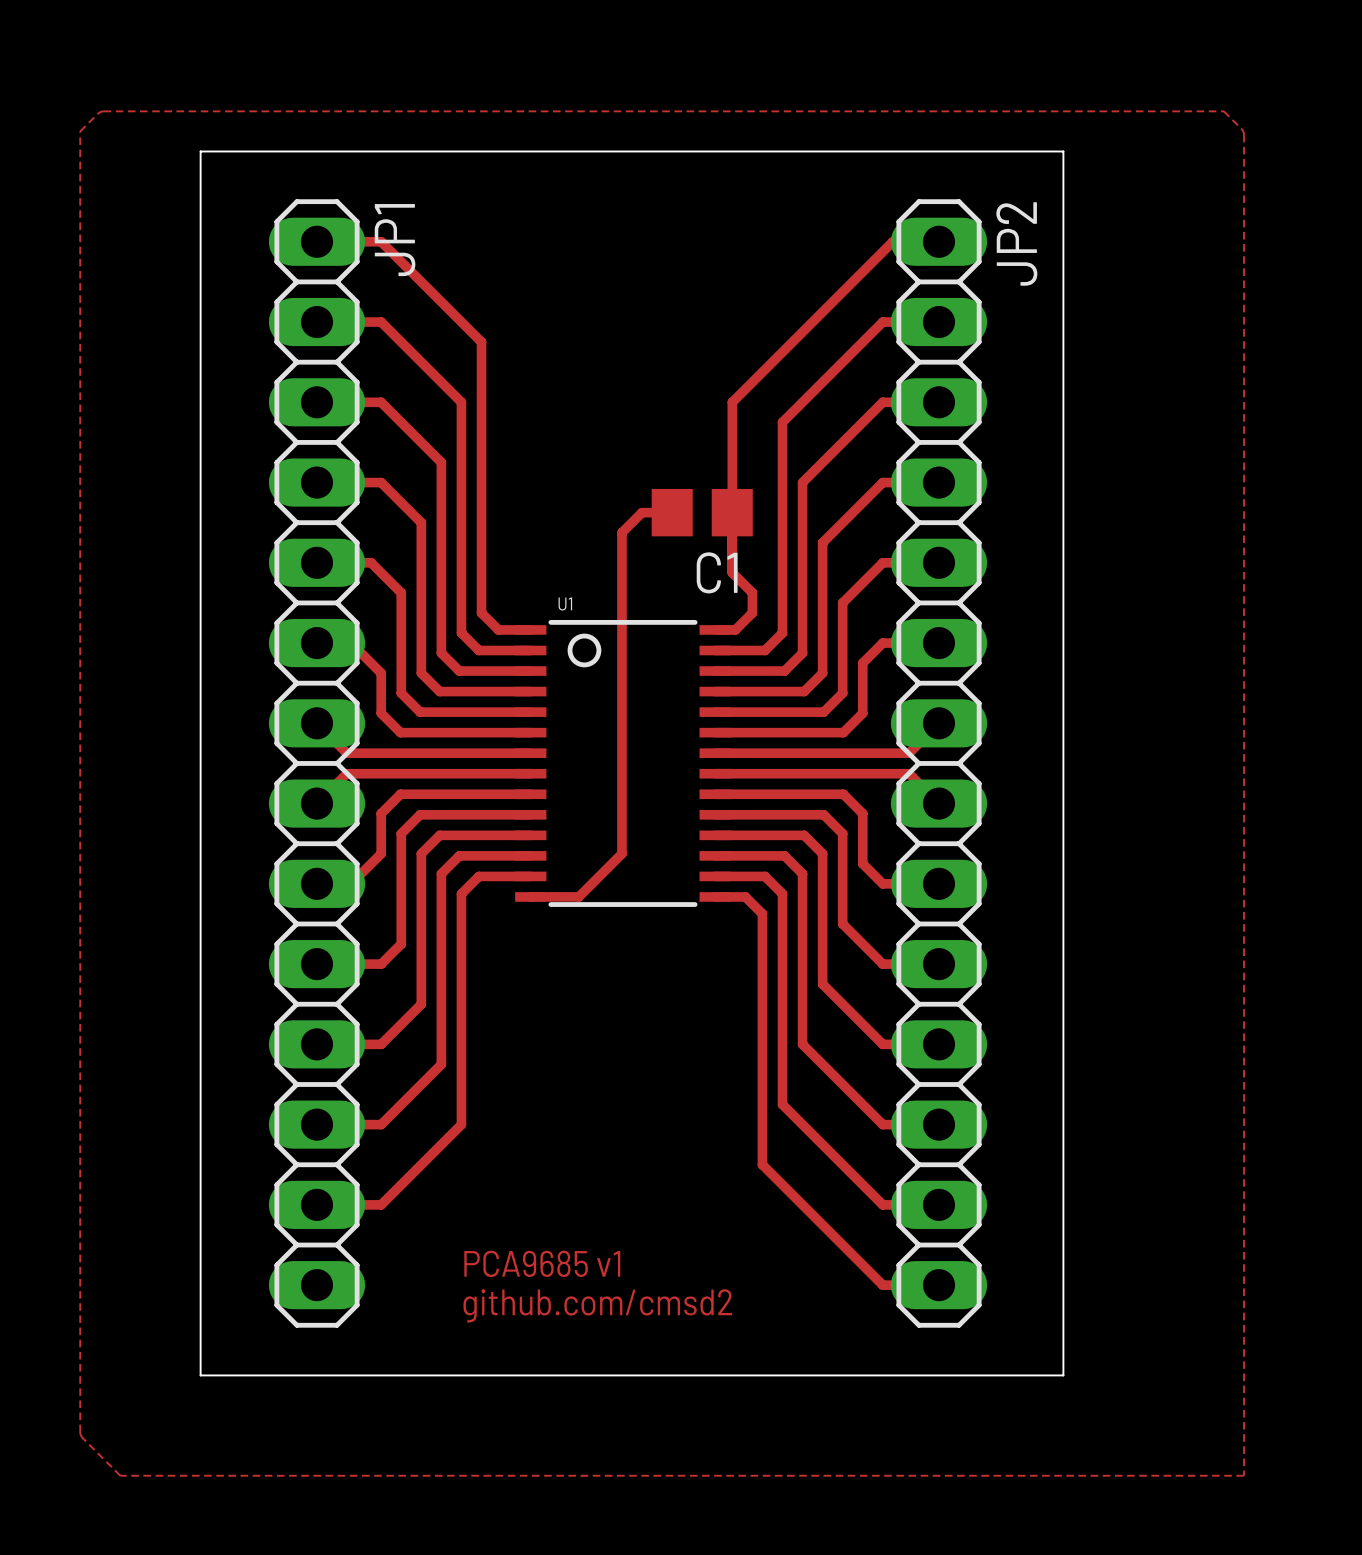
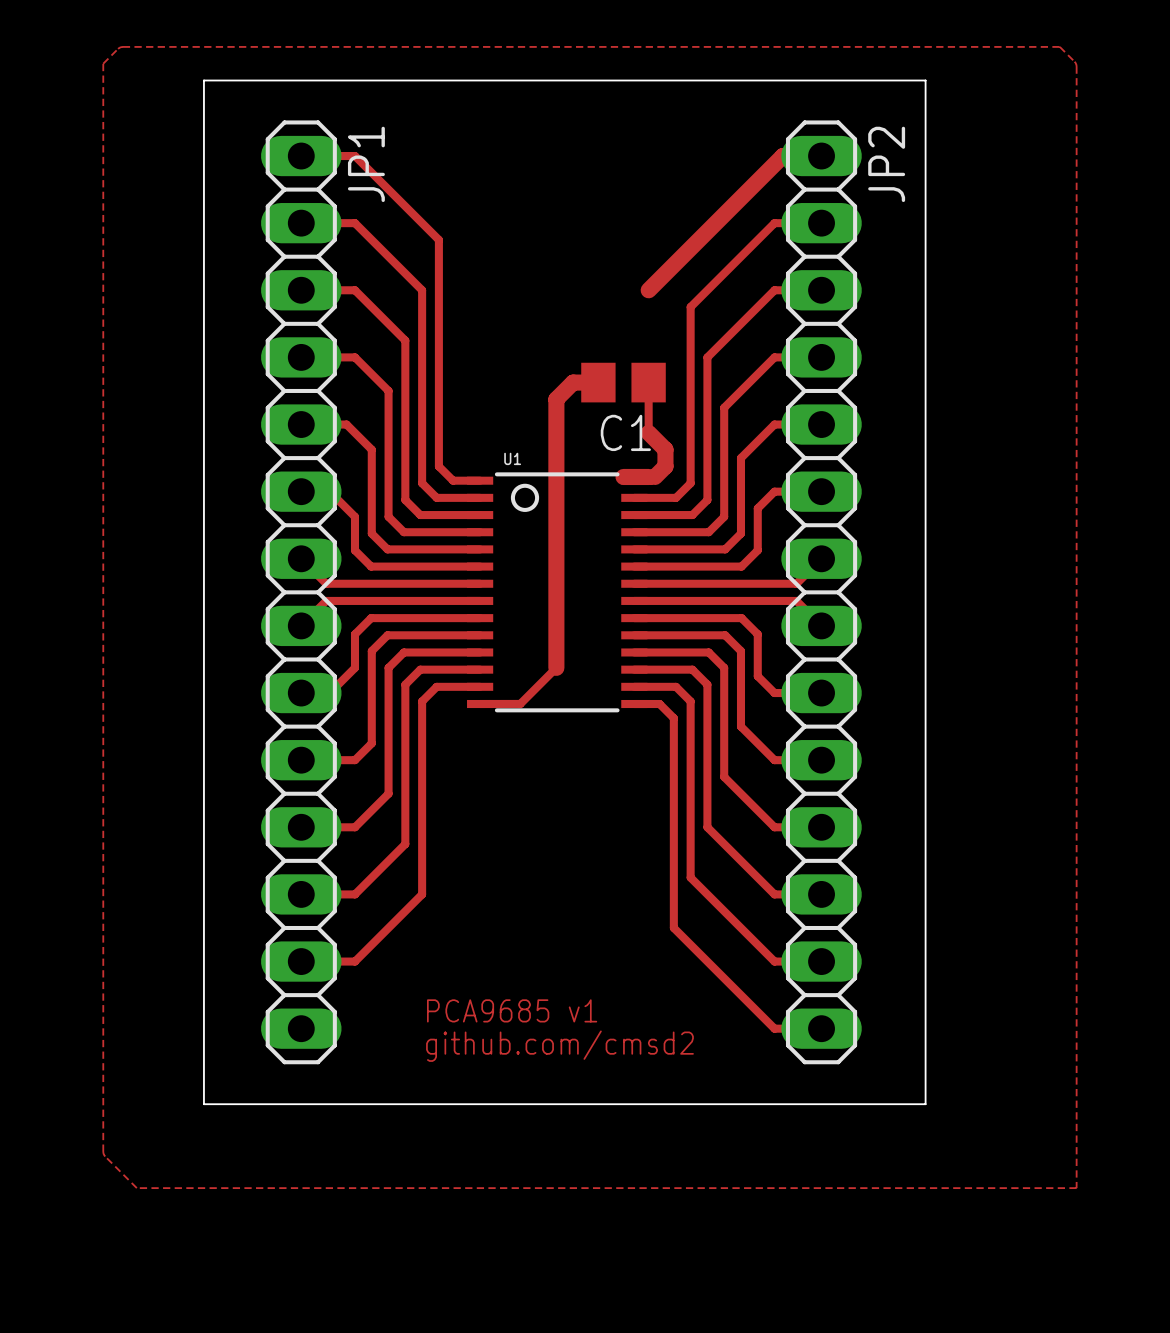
top track width: thin (939, 241) (892, 241) (732, 402) -> thick (821, 156) (782, 156) (648, 290)
top track: (732, 402) (732, 572) -> none
top track width: thin (672, 512) (642, 512) (621, 532) (621, 853) -> thick (598, 382) (573, 382) (556, 399) (556, 667)
top track width: thin (732, 572) (752, 592) (752, 612) (739, 625) -> thick (648, 432) (665, 449) (665, 466) (654, 476)
top track: none -> (623, 476) (648, 476)

